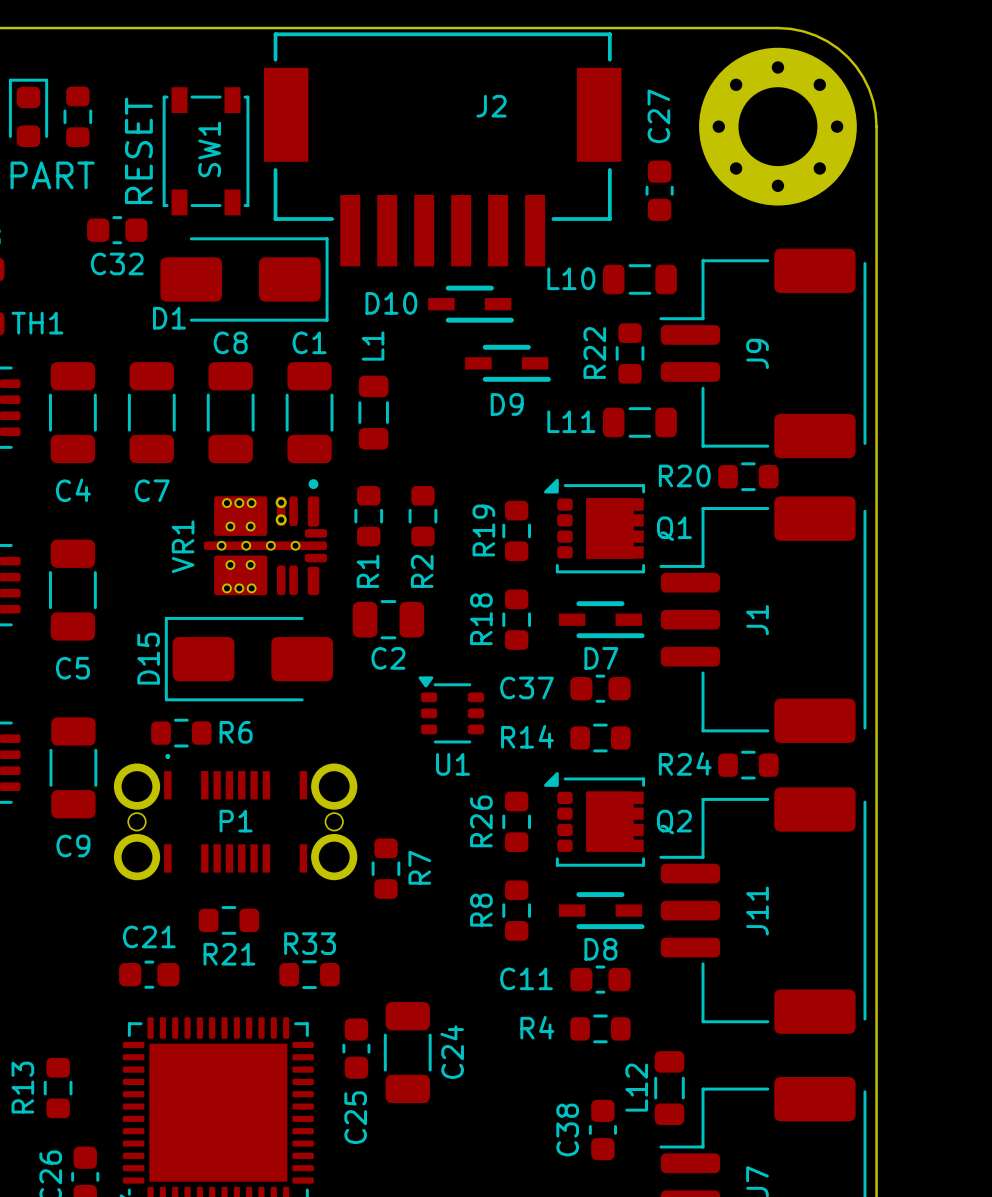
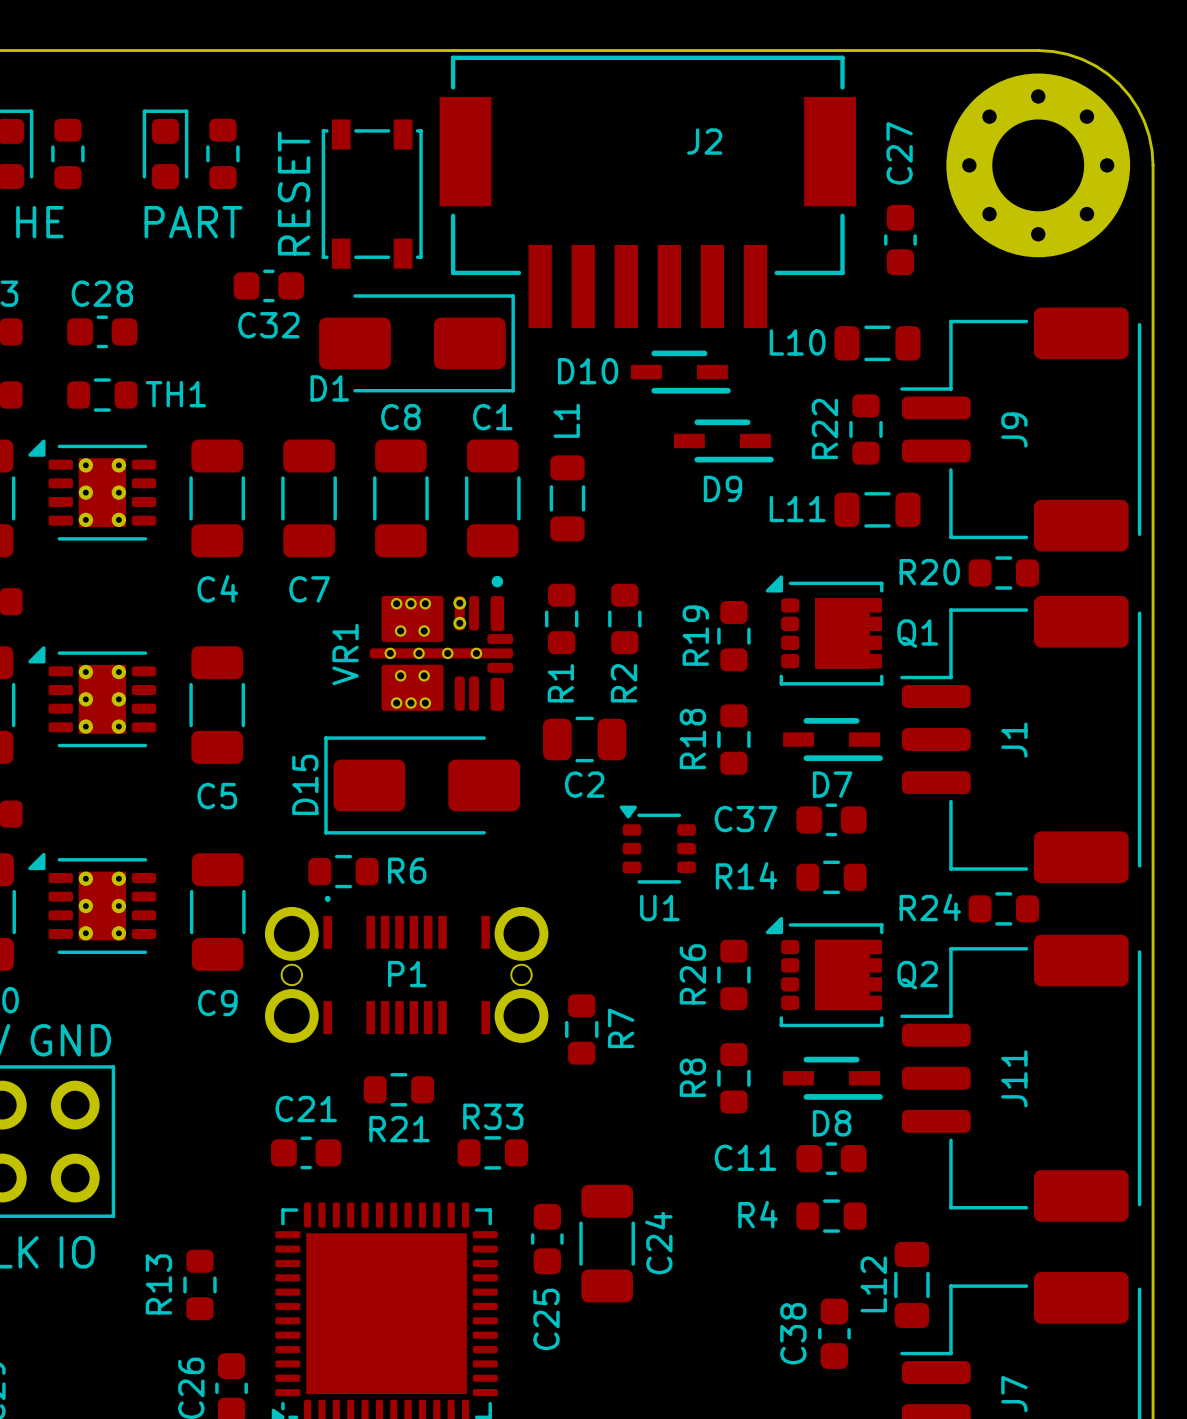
SW1 name: SW1 (209, 149) -> none

